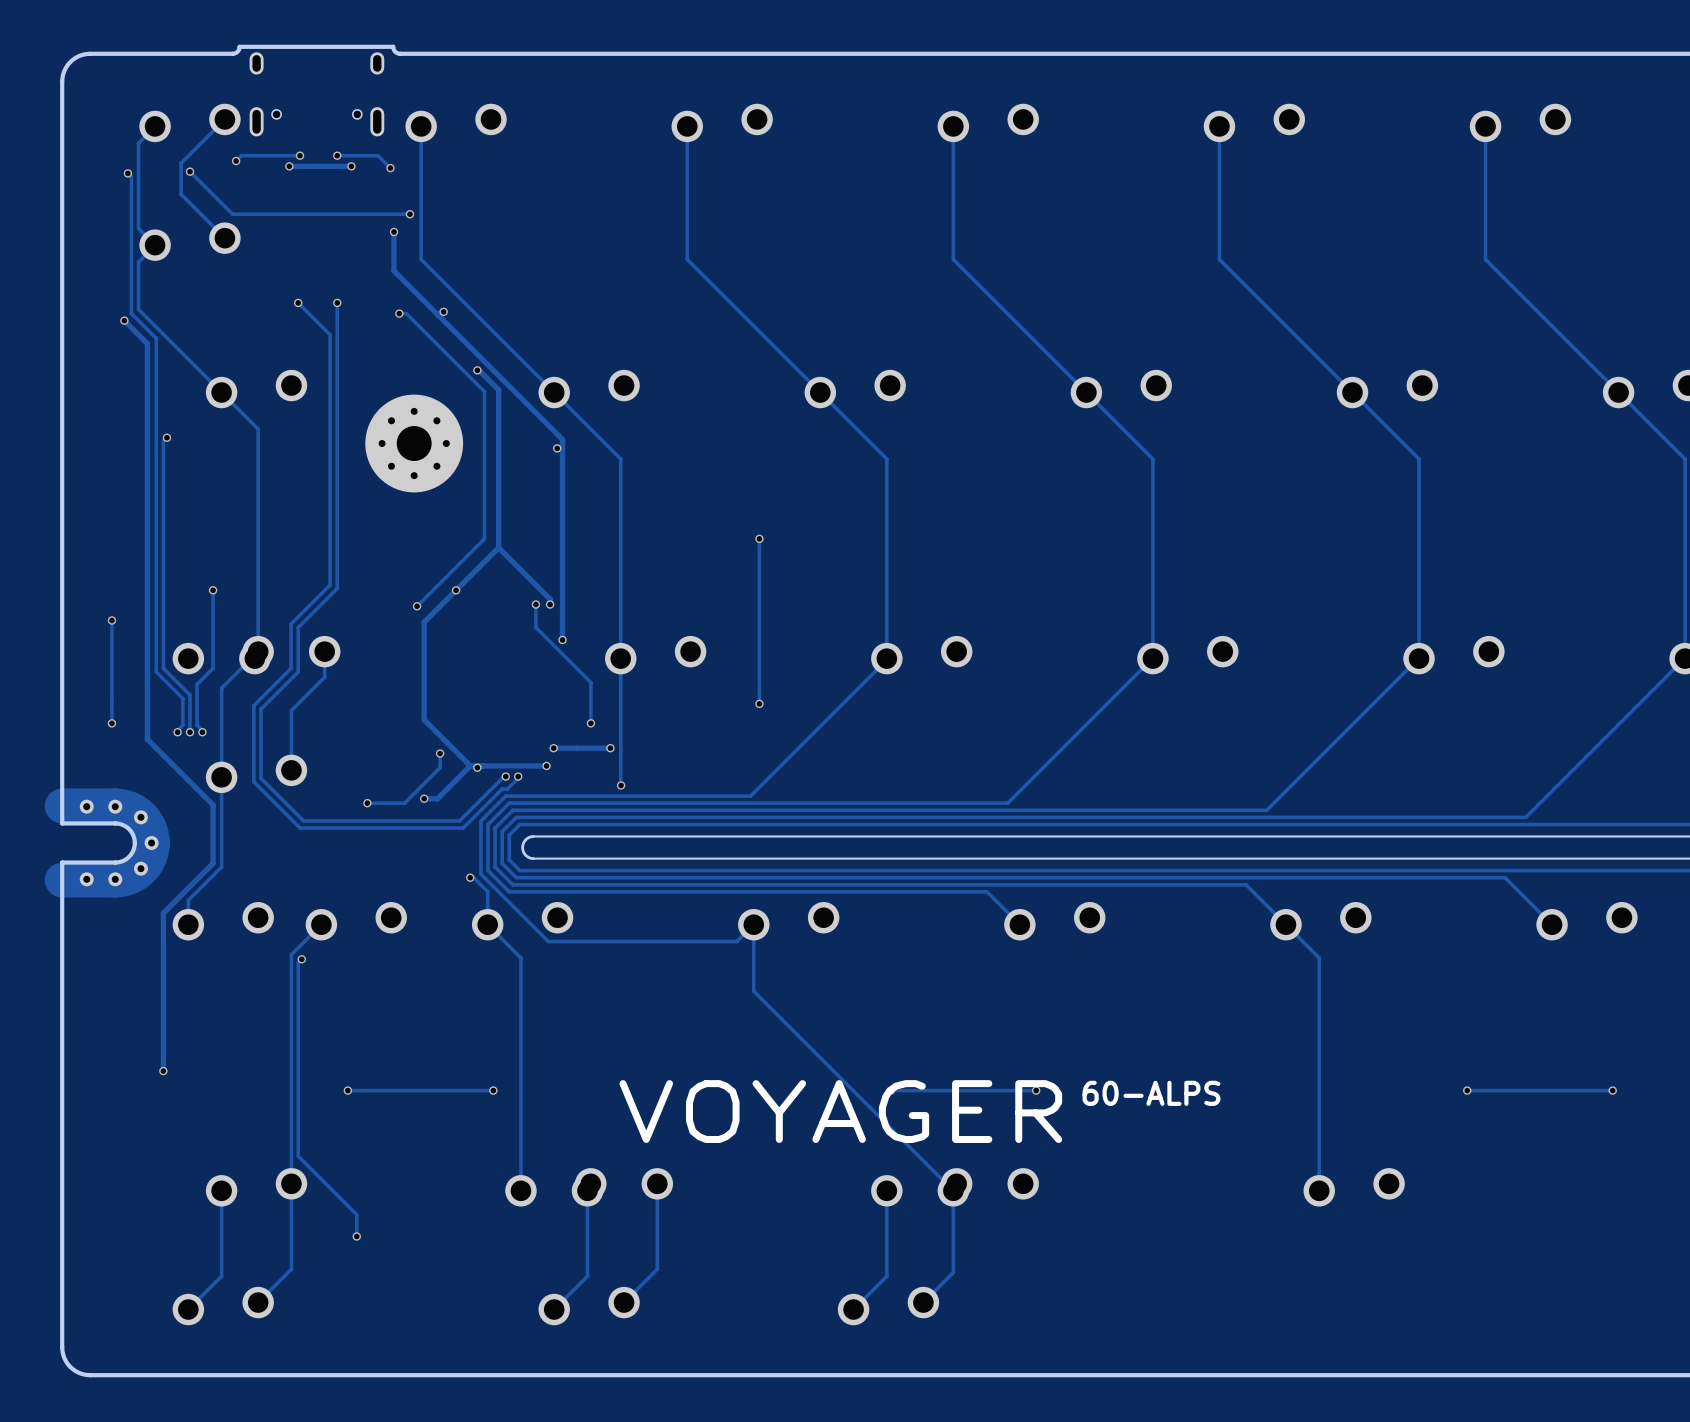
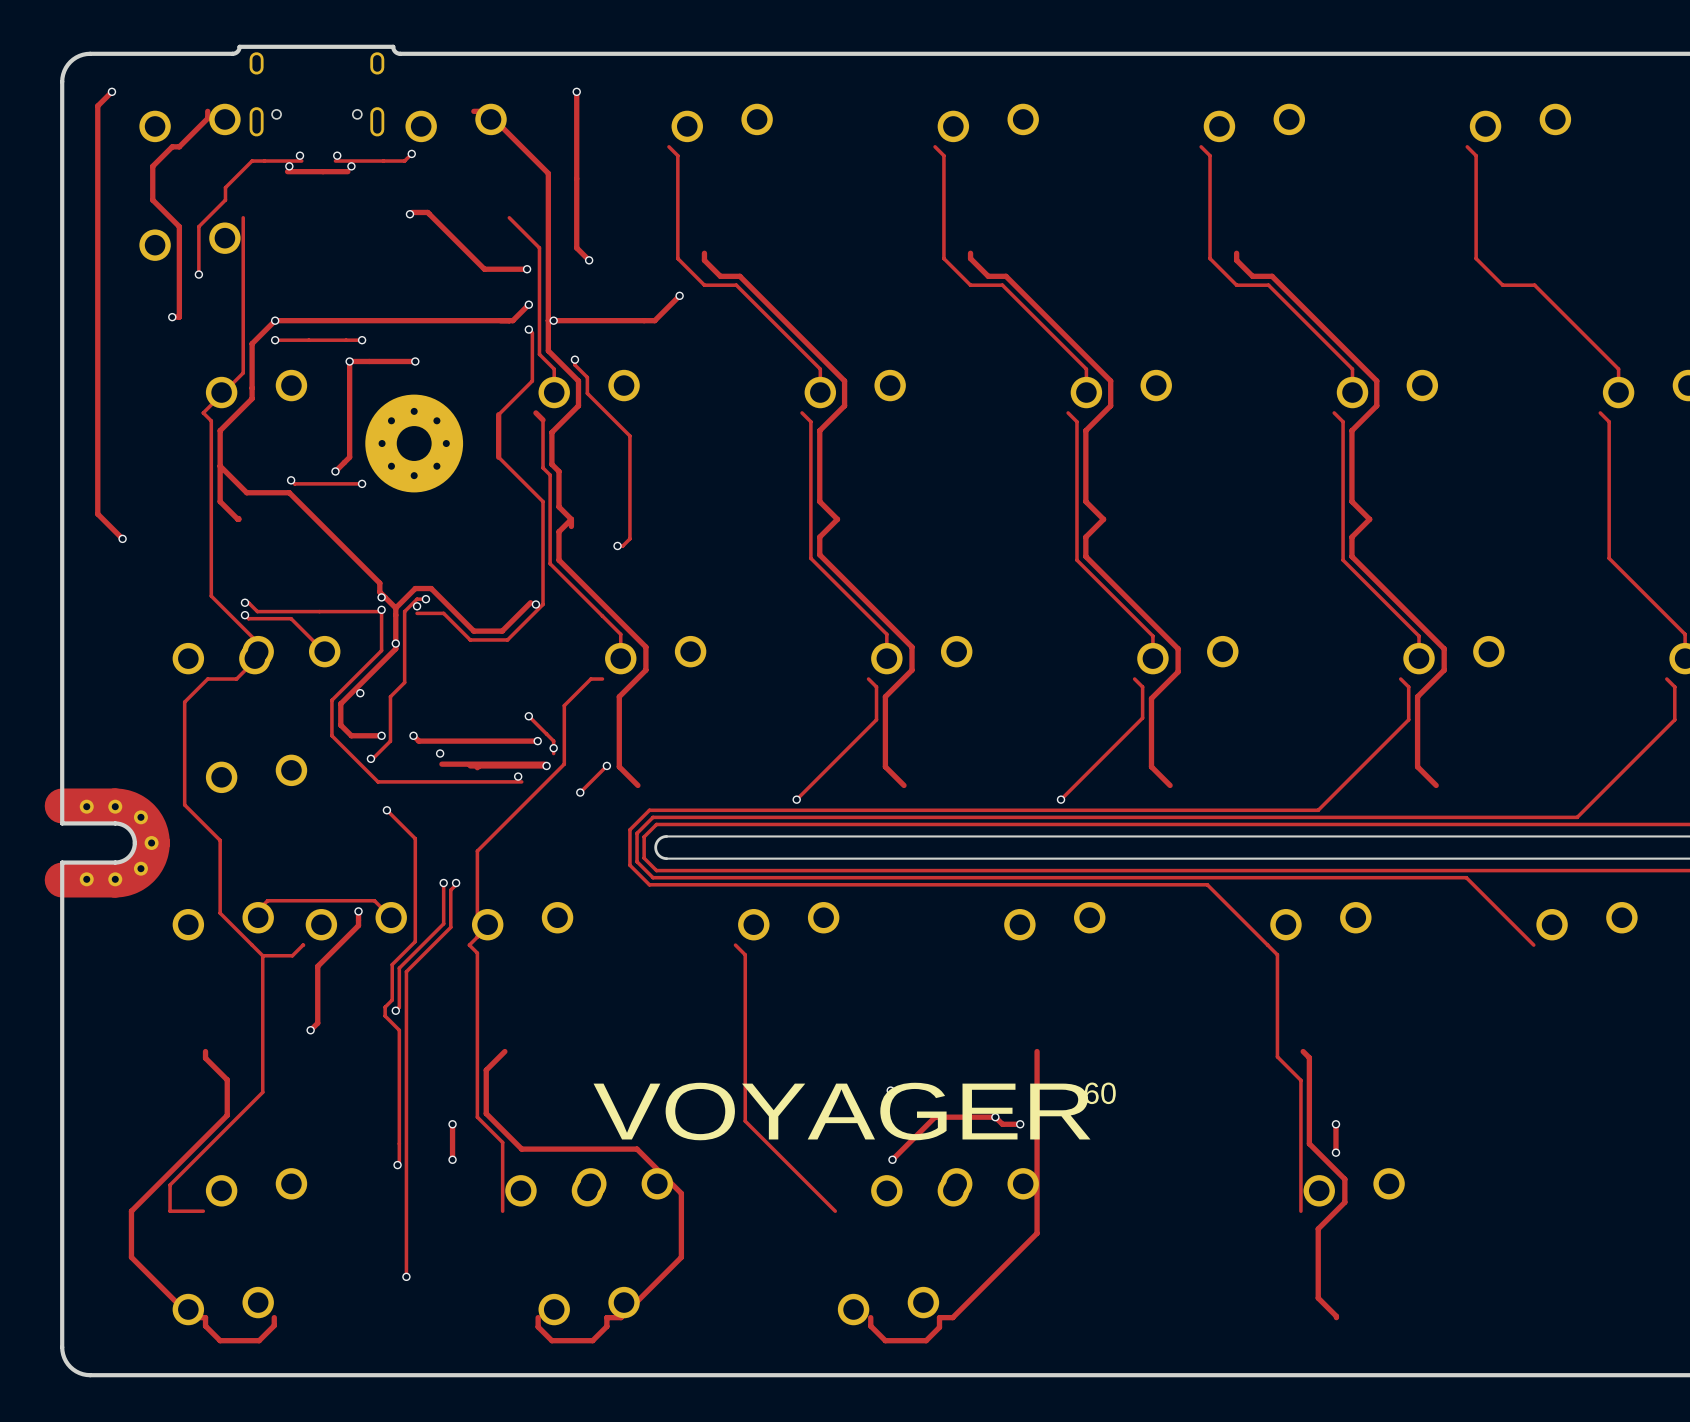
track: none -> (111, 91) (97, 106) (97, 514) (122, 538)
via: none -> (111, 91)
track: none -> (576, 91) (576, 247) (589, 260)
via: none -> (576, 91)
track: none -> (207, 111) (207, 118) (179, 146) (172, 146) (152, 166) (152, 200) (179, 226) (179, 317) (172, 317)
track: none -> (473, 111) (486, 111) (548, 173) (548, 350) (578, 380) (578, 405) (551, 432) (551, 464) (558, 471) (558, 506) (571, 519)
track: (224, 119) (181, 163) (181, 194) (224, 238) -> none
track: (155, 126) (138, 143) (138, 228) (155, 245) (138, 262) (138, 309) (258, 429) (258, 651) (221, 688) (221, 867) (188, 900) (188, 924) -> none
track: (421, 126) (421, 259) (620, 459) (620, 634) -> none
track: (687, 126) (687, 259) (886, 459) (886, 634) -> (802, 412) (810, 421) (810, 558) (886, 634)
track: (953, 126) (953, 259) (1152, 459) (1152, 636) -> (1068, 412) (1076, 421) (1076, 560) (1152, 636)
track: (1219, 126) (1219, 259) (1419, 459) (1419, 636) -> (1334, 412) (1343, 421) (1343, 560) (1419, 636)
track: (1485, 126) (1485, 259) (1685, 459) (1685, 634) -> (1600, 412) (1609, 421) (1609, 558) (1685, 634)
track: none -> (668, 146) (677, 155) (677, 258) (704, 285) (736, 285) (820, 369) (820, 392)
track: none -> (935, 146) (943, 155) (943, 258) (970, 285) (1002, 285) (1086, 369) (1086, 392)
track: none -> (1201, 146) (1210, 155) (1210, 258) (1236, 285) (1268, 285) (1352, 369) (1352, 392)
track: none -> (1467, 146) (1476, 155) (1476, 258) (1502, 285) (1534, 285) (1618, 369) (1618, 392)
track: none -> (411, 153) (404, 161) (335, 161)
track: (299, 155) (241, 155) (236, 161) -> none
track: (337, 155) (378, 155) (390, 168) -> none
via: (236, 161) -> none
track: none -> (301, 161) (252, 161) (225, 187) (225, 200) (198, 226) (198, 274)
track: (289, 166) (351, 166) -> none
via position: (390, 168) -> (411, 153)
track: (190, 171) (232, 214) (409, 214) -> none
via: (190, 171) -> none
track: none -> (287, 171) (347, 171)
track: (127, 173) (131, 176) (131, 313) (156, 338) (156, 671) (182, 698) (182, 725) (177, 732) -> none
via: (127, 173) -> none
track: none -> (411, 212) (427, 212) (484, 269) (527, 269)
track: none -> (243, 217) (243, 373) (203, 412) (211, 420) (211, 596) (258, 643) (258, 656) (236, 679) (207, 679) (184, 702) (184, 804) (220, 840) (220, 913) (262, 955)
track: none -> (509, 217) (539, 247) (539, 354) (554, 369) (554, 392)
track: (394, 231) (394, 271) (535, 412) -> none
via: (394, 231) -> none
track: none -> (704, 253) (704, 260) (720, 276) (739, 276) (844, 380) (844, 405) (819, 430) (819, 501) (837, 519) (819, 537) (819, 554) (912, 647) (912, 670) (885, 696) (885, 766) (904, 785)
track: none -> (970, 253) (970, 258) (988, 276) (1006, 276) (1110, 380) (1110, 405) (1085, 430) (1085, 501) (1103, 519) (1085, 537) (1085, 556) (1178, 648) (1178, 671) (1151, 698) (1151, 766) (1170, 785)
track: none -> (1236, 253) (1236, 260) (1252, 276) (1272, 276) (1376, 380) (1376, 405) (1351, 430) (1351, 501) (1369, 519) (1351, 537) (1351, 556) (1444, 648) (1444, 670) (1417, 696) (1417, 766) (1436, 785)
via: none -> (589, 260)
via: none -> (527, 269)
via: none -> (198, 274)
track: none -> (679, 295) (654, 320) (548, 320)
via: none -> (679, 295)
track: (298, 302) (330, 334) (330, 584) (291, 624) (291, 668) (253, 705) (253, 781) (299, 828) (463, 828) (502, 789) (507, 789) (518, 776) -> none
via: (298, 302) -> none
track: (337, 302) (337, 588) (298, 627) (298, 671) (260, 709) (260, 778) (303, 820) (459, 820) (505, 776) -> none
via: (337, 302) -> none
track: none -> (528, 304) (512, 320) (275, 320) (252, 343) (252, 398) (220, 430) (220, 501) (238, 518)
via: none -> (528, 304)
via: (443, 311) -> none
track: (399, 313) (406, 313) (484, 391) (484, 538) (417, 606) -> none
via: (399, 313) -> none
via: none -> (172, 317)
track: (124, 320) (147, 343) (147, 739) (213, 804) (213, 863) (163, 913) (163, 1071) -> none
via: (124, 320) -> none
via: none -> (275, 320)
via: none -> (553, 320)
via: none -> (528, 329)
track: none -> (275, 340) (362, 340)
via: none -> (275, 340)
via: none -> (362, 340)
track: none -> (574, 359) (574, 365) (587, 377) (587, 393) (629, 435) (629, 538) (622, 545) (617, 545)
via: none -> (574, 359)
via: none -> (349, 361)
track: none -> (415, 361) (349, 361) (349, 457) (335, 471)
via: none -> (415, 361)
track: (477, 370) (498, 389) (498, 414) -> (528, 329) (532, 333) (532, 380) (498, 414)
via: (477, 370) -> none
track: (543, 420) (562, 439) (562, 639) -> (543, 420) (543, 467) (550, 475) (550, 563) (620, 634)
track: (166, 437) (163, 441) (163, 668) (190, 694) (190, 732) -> none
via: (166, 437) -> none
via: (557, 448) -> none
track: (498, 457) (498, 547) -> (498, 457) (543, 501) (543, 604) (507, 639) (470, 639) (443, 613) (417, 613)
track: none -> (220, 466) (246, 492) (289, 492) (379, 583) (379, 592) (395, 608)
via: none -> (335, 471)
track: none -> (291, 480) (294, 483) (362, 483)
via: none -> (291, 480)
via: none -> (362, 483)
track: none -> (571, 519) (571, 526)
track: none -> (571, 519) (558, 531) (558, 560) (645, 647) (645, 670) (619, 696) (619, 766) (637, 785)
via: none -> (122, 538)
track: (759, 538) (759, 703) -> none
via: (759, 538) -> none
via: none -> (617, 545)
track: (498, 547) (424, 622) (424, 719) (470, 765) (437, 798) (424, 798) -> none
track: (498, 547) (550, 599) (550, 604) -> none
track: (213, 590) (213, 668) (197, 684) (197, 725) (202, 732) -> none
via: (213, 590) -> none
via position: (456, 590) -> (425, 599)
via: none -> (381, 597)
track: none -> (425, 599) (417, 599) (404, 611) (404, 682) (390, 696) (390, 741) (370, 758)
track: none -> (245, 602) (248, 602) (257, 611) (379, 611) (381, 609) (381, 650) (331, 700) (331, 735) (378, 781) (521, 781)
via: none -> (245, 602)
track: none -> (530, 602) (502, 631) (473, 631) (431, 588) (415, 588) (395, 608)
track: (535, 604) (535, 627) (590, 682) (590, 723) -> none
via: (550, 604) -> none
track: none -> (395, 608) (395, 648) (340, 703) (340, 725) (351, 735) (381, 735)
via: none -> (381, 609)
via: none -> (245, 615)
track: (111, 620) (111, 723) -> none
via: (111, 620) -> none
via: (562, 639) -> none
via: none -> (395, 643)
track: (324, 651) (324, 677) (291, 710) (291, 770) -> (324, 651) (291, 618) (248, 618) (245, 615)
track: (620, 658) (621, 785) -> none
track: (886, 658) (750, 796) (505, 796) (480, 820) (480, 874) (548, 941) (736, 941) (753, 924) (753, 991) (953, 1190) (953, 1272) (923, 1302) -> none
track: (1152, 658) (1007, 803) (509, 803) (488, 824) (488, 870) (509, 891) (987, 891) (1019, 924) -> none
track: (1419, 658) (1266, 810) -> (1400, 679) (1408, 687) (1408, 719) (1318, 810) (1266, 810)
track: (1685, 658) (1525, 817) -> (1666, 679) (1674, 687) (1674, 719) (1577, 817) (1525, 817)
track: none -> (602, 679) (590, 679) (564, 705) (564, 764) (477, 851) (477, 937) (469, 945) (477, 953) (477, 1117) (502, 1142) (502, 1211)
track: none -> (868, 679) (876, 687) (876, 719) (796, 799)
track: none -> (1134, 679) (1142, 687) (1142, 718) (1061, 799)
via: none -> (360, 693)
via: (759, 703) -> none
track: none -> (528, 716) (553, 741) (553, 753)
via: none -> (528, 716)
via: (111, 723) -> none
via: (590, 723) -> none
via: (177, 732) -> none
via: (190, 732) -> none
via: (202, 732) -> none
via: none -> (381, 735)
track: none -> (413, 735) (418, 741) (537, 741)
via: none -> (413, 735)
via: none -> (537, 741)
track: (553, 748) (610, 748) -> none
via: (610, 748) -> none
track: (440, 753) (440, 767) (404, 803) (367, 803) -> none
via: none -> (370, 758)
track: none -> (441, 764) (544, 764)
track: none -> (606, 765) (580, 792)
via: none -> (606, 765)
via: (477, 767) -> none
via: (505, 776) -> none
via: (621, 785) -> none
via: none -> (580, 792)
via: (424, 798) -> none
via: none -> (796, 799)
via: none -> (1061, 799)
via: (367, 803) -> none
track: none -> (386, 810) (415, 838) (415, 941) (392, 964) (392, 1000) (385, 1007) (385, 1016) (399, 1030) (399, 1163) (397, 1165)
via: none -> (386, 810)
track: (649, 810) (512, 810) (495, 828) (495, 867) (512, 884) (649, 884) -> (649, 810) (629, 829) (629, 865) (649, 884)
track: (653, 817) (516, 817) (502, 831) (502, 863) (516, 877) (653, 877) -> (653, 817) (637, 833) (637, 861) (653, 877)
track: (656, 824) (519, 824) (509, 835) (509, 859) (519, 870) (656, 870) -> (656, 824) (644, 836) (644, 858) (656, 870)
board edge: (666, 836) (532, 836) (524, 840) (522, 847) (524, 854) (532, 858) (666, 858) -> (666, 836) (658, 839) (655, 847) (658, 855) (666, 858)
track: (470, 877) (473, 877) (487, 891) (487, 924) (520, 957) (520, 1190) -> none
via: (470, 877) -> none
track: (1466, 877) (1505, 877) (1552, 924) -> (1466, 877) (1533, 945)
track: none -> (443, 883) (443, 923) (399, 968) (399, 1007) (395, 1010)
via: none -> (443, 883)
track: none -> (456, 883) (450, 890) (450, 927) (406, 971) (406, 1276)
via: none -> (456, 883)
track: (1207, 884) (1246, 884) (1319, 957) (1319, 1190) -> (1207, 884) (1277, 954) (1277, 1056) (1300, 1080) (1300, 1211)
track: none -> (258, 909) (267, 900) (374, 900) (391, 917)
track: none -> (358, 911) (358, 925) (317, 966) (317, 1023) (310, 1030)
via: none -> (358, 911)
track: (321, 924) (291, 954) (291, 1269) (258, 1302) -> none
track: none -> (303, 945) (292, 955) (262, 955)
track: none -> (735, 945) (745, 954) (745, 1121) (835, 1211)
track: none -> (262, 955) (262, 1092) (170, 1185) (170, 1211) (203, 1211)
track: (301, 959) (298, 962) (298, 1156) (356, 1214) (356, 1236) -> none
via: (301, 959) -> none
via: none -> (395, 1010)
via: none -> (310, 1030)
track: none -> (205, 1051) (205, 1058) (227, 1079) (227, 1115) (131, 1211) (131, 1257) (191, 1317) (205, 1317) (205, 1326) (220, 1340) (259, 1340) (274, 1325) (274, 1317)
track: none -> (504, 1051) (486, 1070) (486, 1113) (521, 1149) (637, 1149) (681, 1193) (681, 1257) (621, 1317) (606, 1317) (606, 1326) (592, 1340) (551, 1340) (538, 1326) (538, 1317)
track: none -> (1037, 1051) (1037, 1233) (952, 1317) (939, 1317) (939, 1327) (926, 1340) (885, 1340) (870, 1326) (870, 1317)
track: none -> (1303, 1051) (1309, 1057) (1309, 1143) (1344, 1179) (1344, 1202) (1318, 1228) (1318, 1298) (1336, 1317)
via: (163, 1071) -> none
track: (347, 1090) (493, 1090) -> none
via: (347, 1090) -> none
via: (493, 1090) -> none
track: (890, 1090) (1036, 1090) -> none
via: (1036, 1090) -> none
track: (1467, 1090) (1612, 1090) -> none
via: (1467, 1090) -> none
via: (1612, 1090) -> none
text: none -> 60 (1100, 1093)
text: 60-ALPS (1151, 1093) -> none
via: none -> (995, 1117)
track: none -> (452, 1124) (452, 1159)
via: none -> (452, 1124)
track: none -> (1020, 1124) (1002, 1124) (995, 1117) (935, 1117) (892, 1159)
via: none -> (1020, 1124)
track: none -> (1335, 1124) (1335, 1152)
via: none -> (1335, 1124)
via: none -> (1335, 1152)
via: none -> (452, 1159)
via: none -> (892, 1159)
via: none -> (397, 1165)
track: (657, 1183) (657, 1269) (624, 1302) -> none
track: (221, 1190) (221, 1276) (188, 1309) -> none
track: (587, 1190) (587, 1276) (554, 1309) -> none
track: (886, 1190) (886, 1276) (853, 1309) -> none
via: (356, 1236) -> none
via: none -> (406, 1276)

